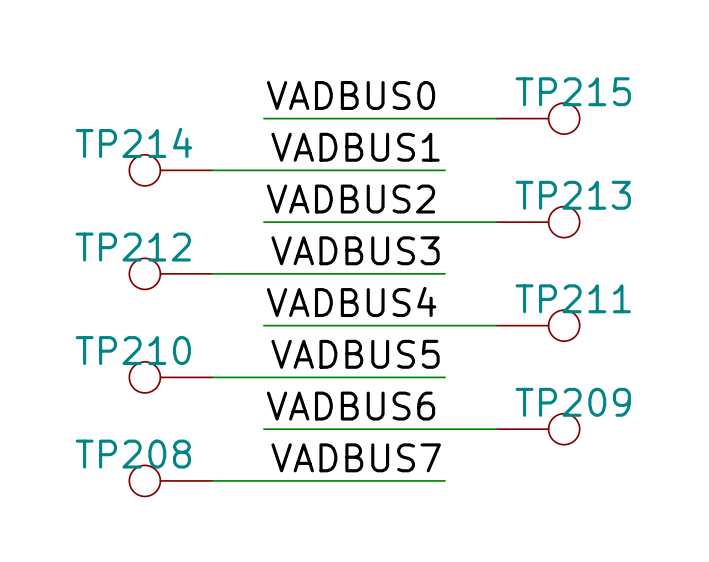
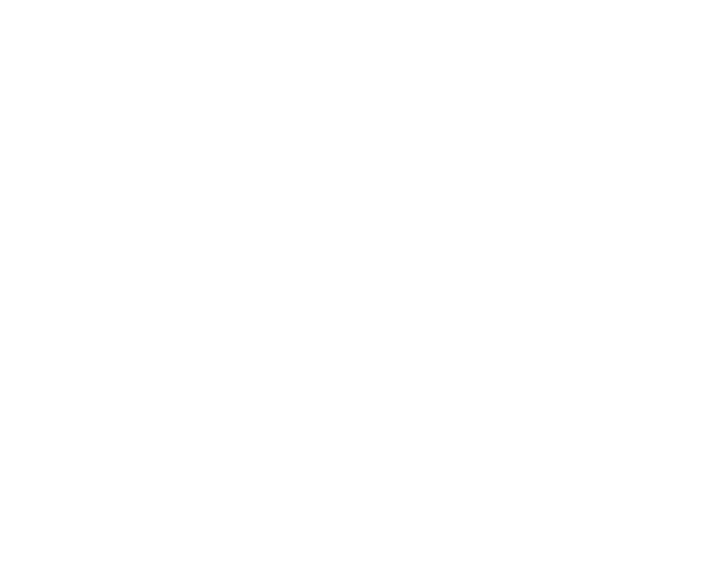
label: VADBUS0 (350, 95) -> none
wire: (263, 118) (496, 118) -> none
TP215: (538, 118) -> none
label: VADBUS1 (355, 147) -> none
TP214: (170, 170) -> none
wire: (212, 170) (445, 170) -> none
label: VADBUS2 (350, 199) -> none
wire: (263, 222) (496, 222) -> none
TP213: (538, 222) -> none
label: VADBUS3 (355, 250) -> none
TP212: (170, 273) -> none
wire: (212, 273) (445, 273) -> none
label: VADBUS4 (351, 301) -> none
wire: (263, 325) (496, 325) -> none
TP211: (538, 325) -> none
label: VADBUS5 (355, 354) -> none
TP210: (170, 377) -> none
wire: (212, 377) (445, 377) -> none
label: VADBUS6 (350, 406) -> none
wire: (263, 429) (496, 429) -> none
TP209: (538, 429) -> none
label: VADBUS7 (356, 457) -> none
TP208: (170, 480) -> none
wire: (212, 480) (445, 480) -> none

